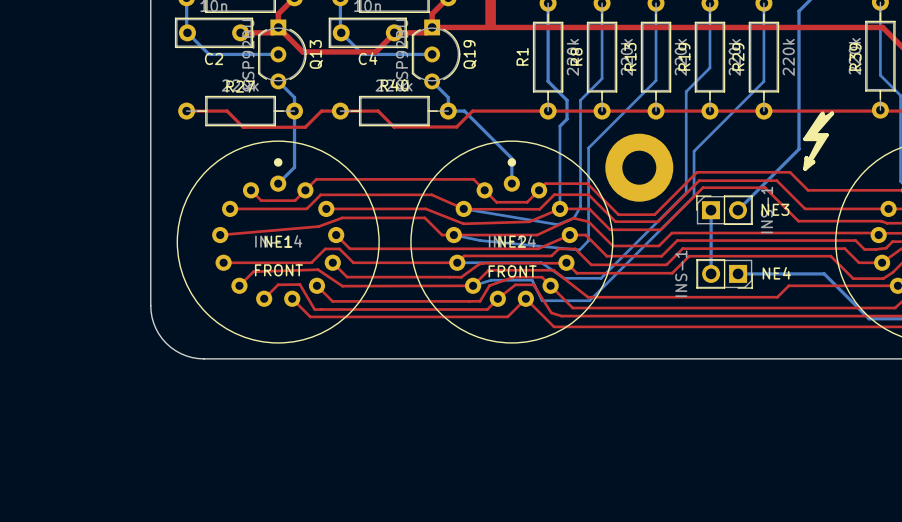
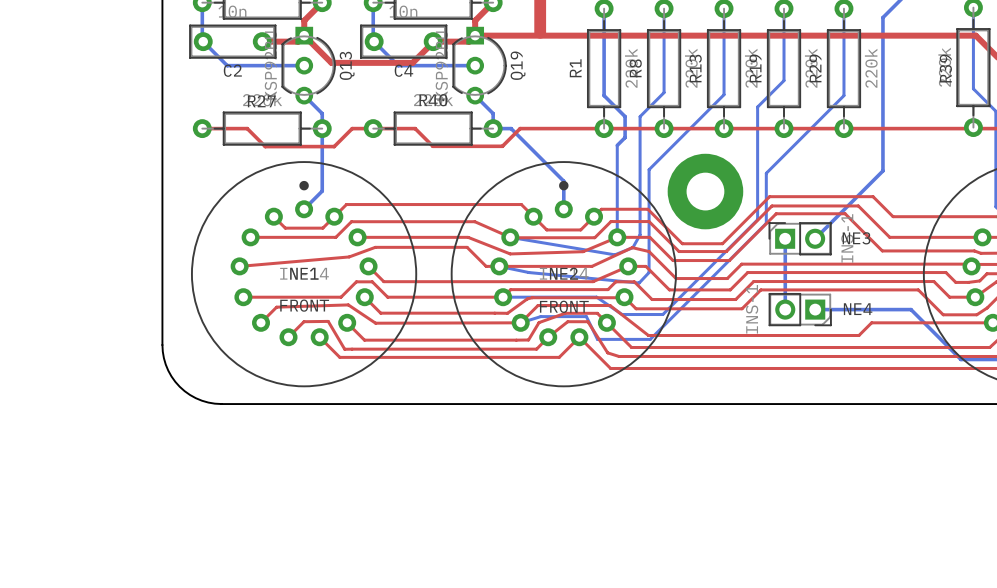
drawing: [803, 111, 835, 171] -> none

